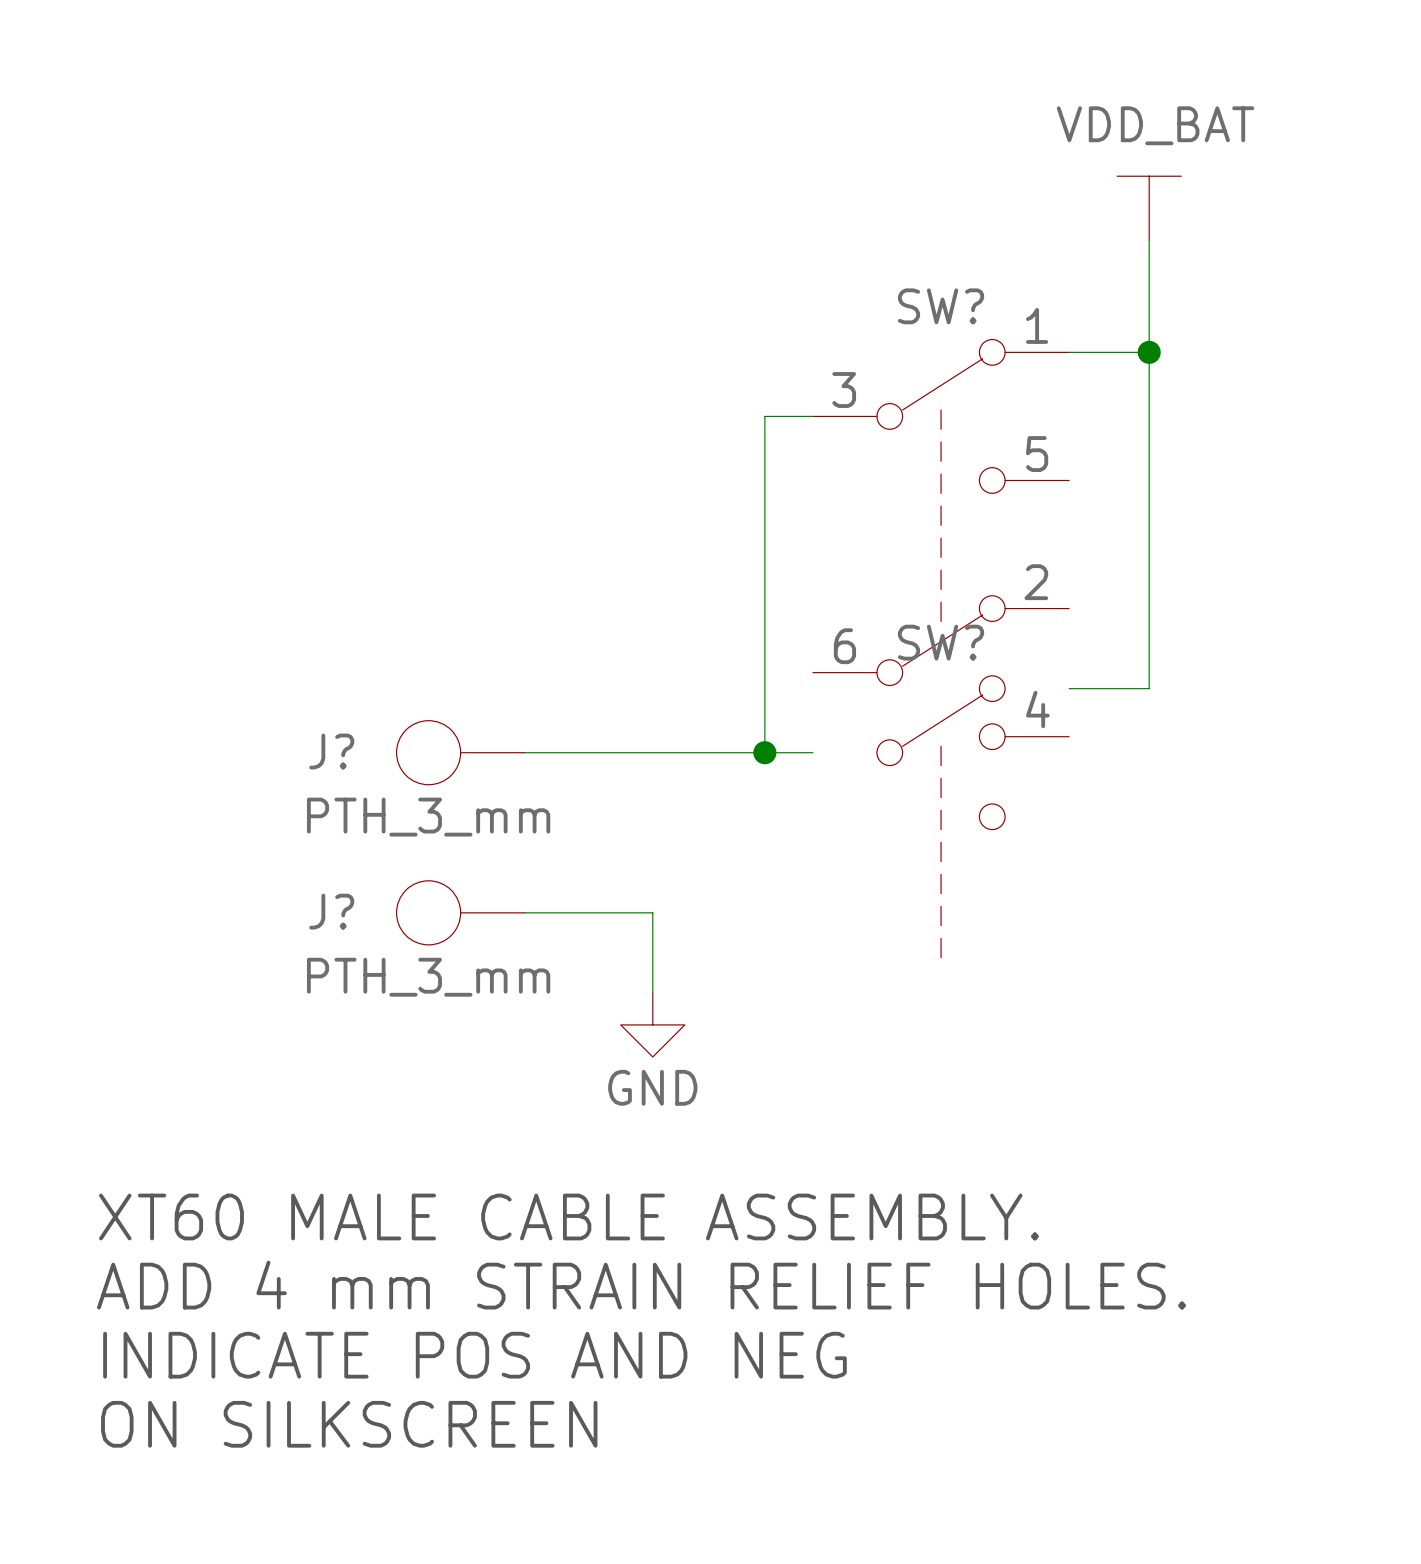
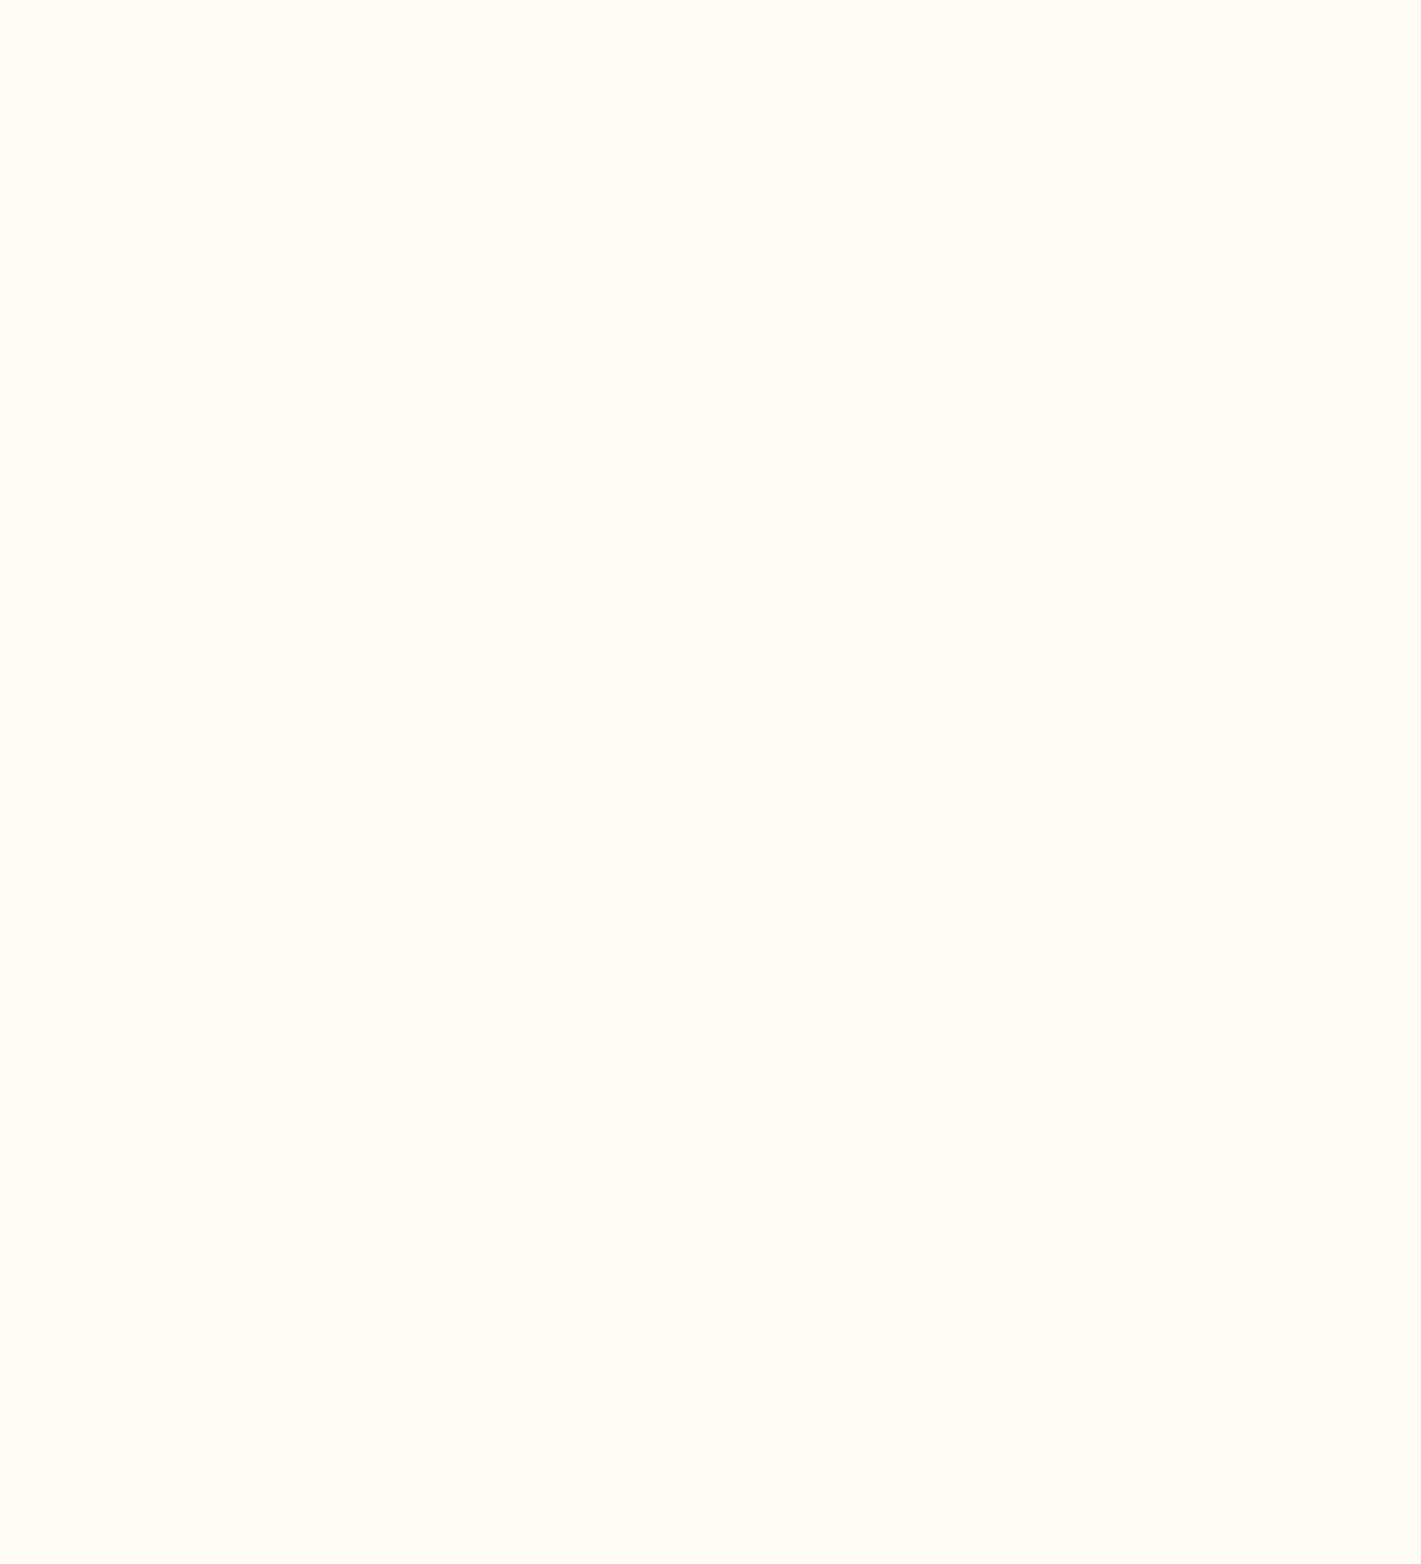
power symbol: VDD_BAT (1149, 208) -> none
wire: (1149, 240) (1149, 688) (1069, 688) -> none
wire: (1069, 352) (1149, 352) -> none
junction: (1149, 352) -> none
wire: (812, 416) (764, 416) (764, 752) -> none
SW?: (941, 544) -> none
J?: PTH_3_mm (460, 752) -> none
wire: (524, 752) (812, 752) -> none
junction: (764, 752) -> none
SW?: (941, 816) -> none
J?: PTH_3_mm (460, 912) -> none
wire: (524, 912) (652, 912) (652, 992) -> none
power symbol: GND (652, 1024) -> none
text: XT60 MALE CABLE ASSEMBLY. (568, 1217) -> none
text: ADD 4 mm STRAIN RELIEF HOLES. (641, 1285) -> none
text: INDICATE POS AND NEG (474, 1355) -> none
text: ON SILKSCREEN (349, 1424) -> none

